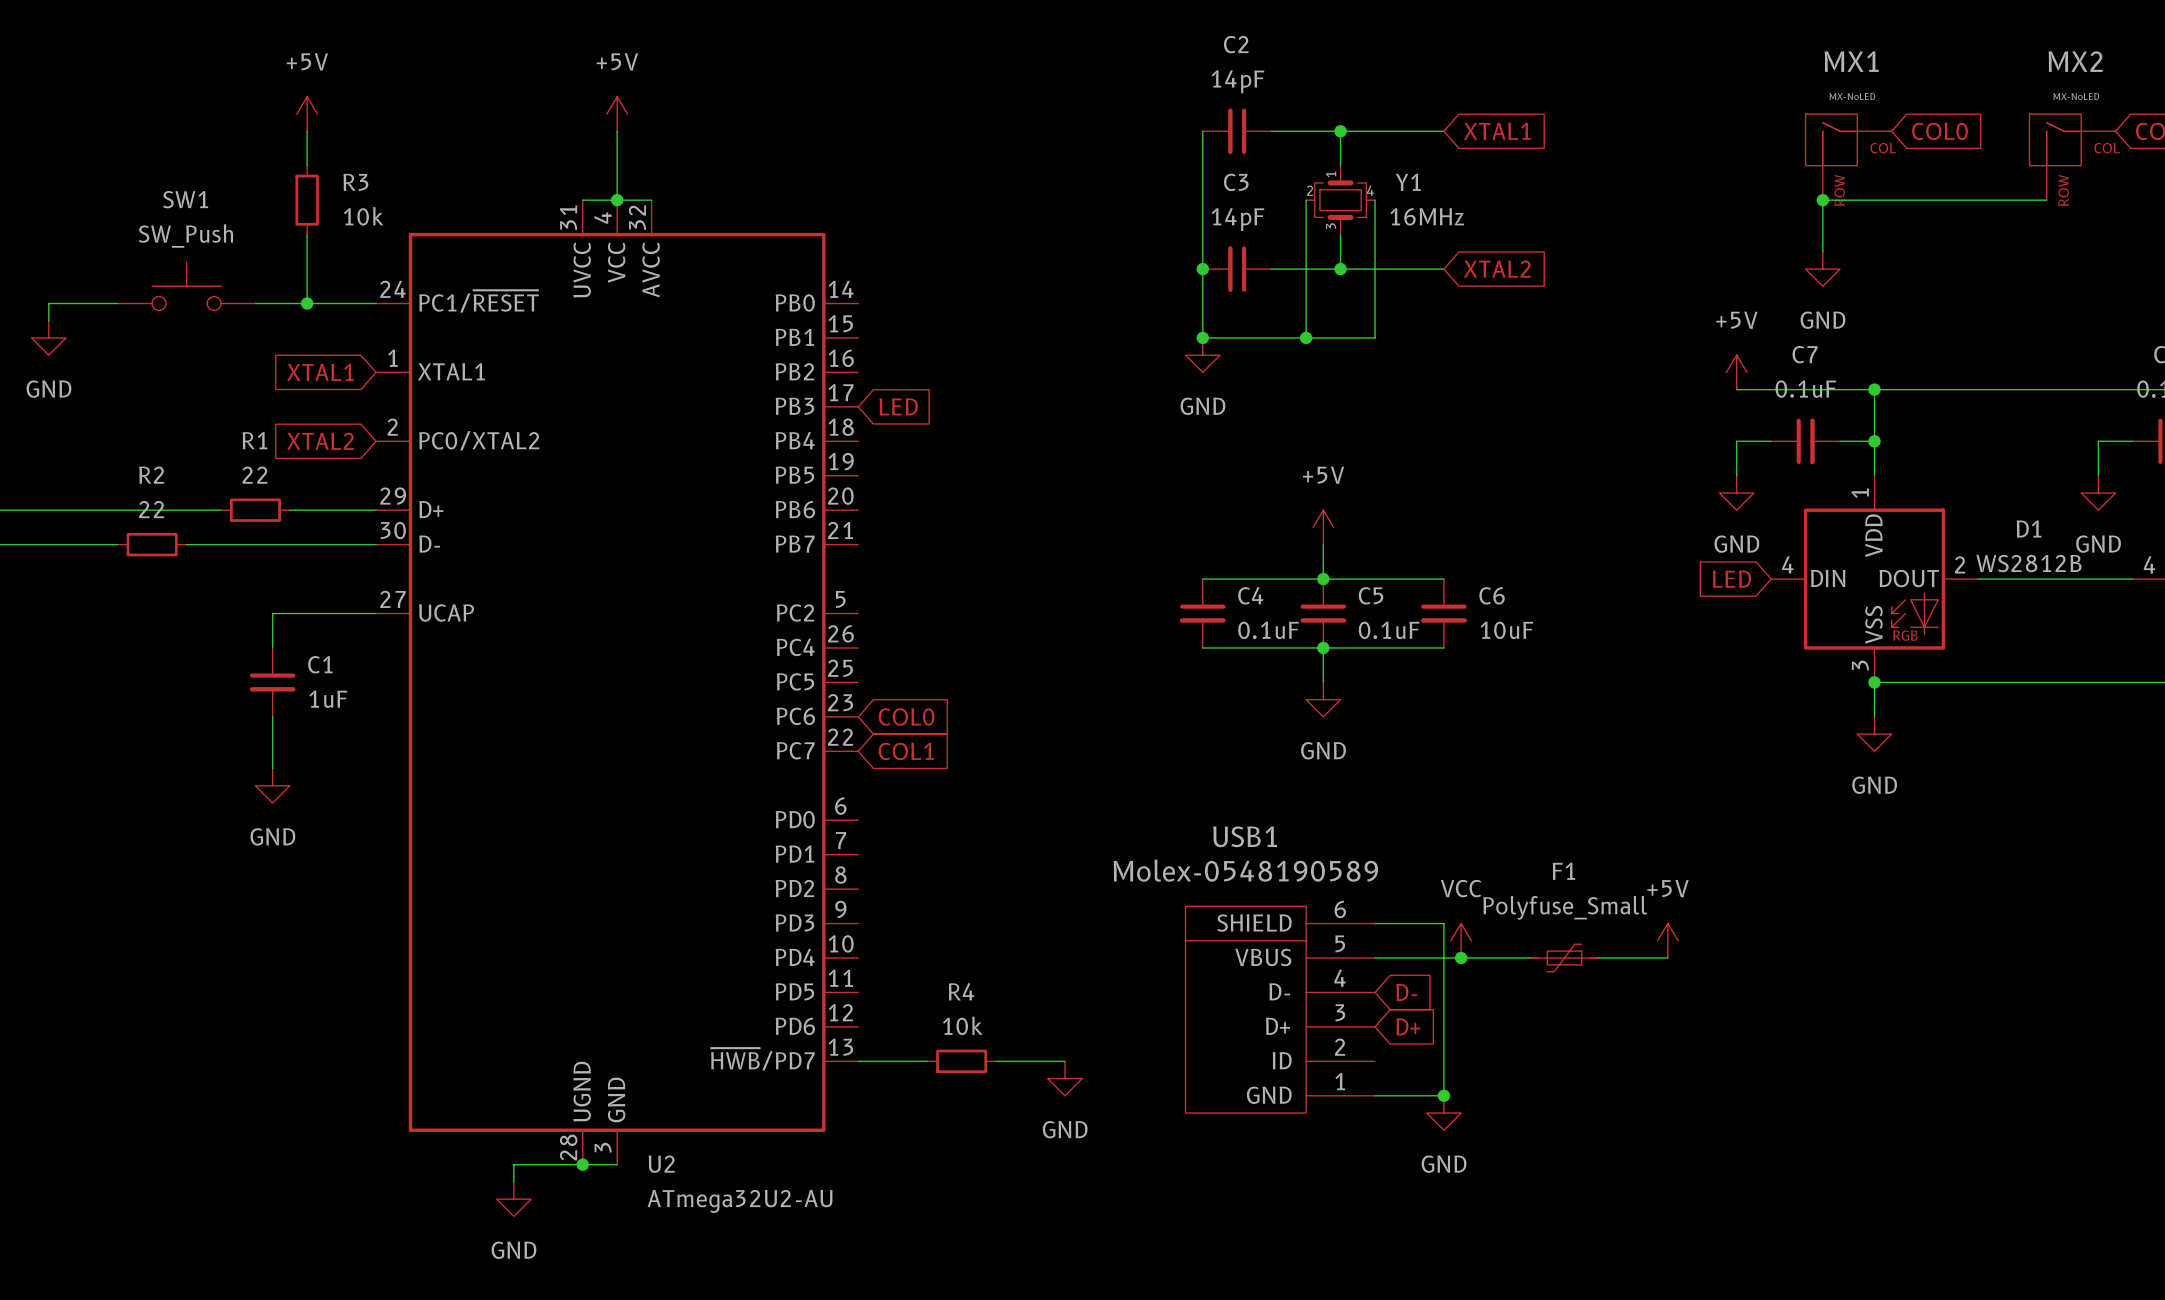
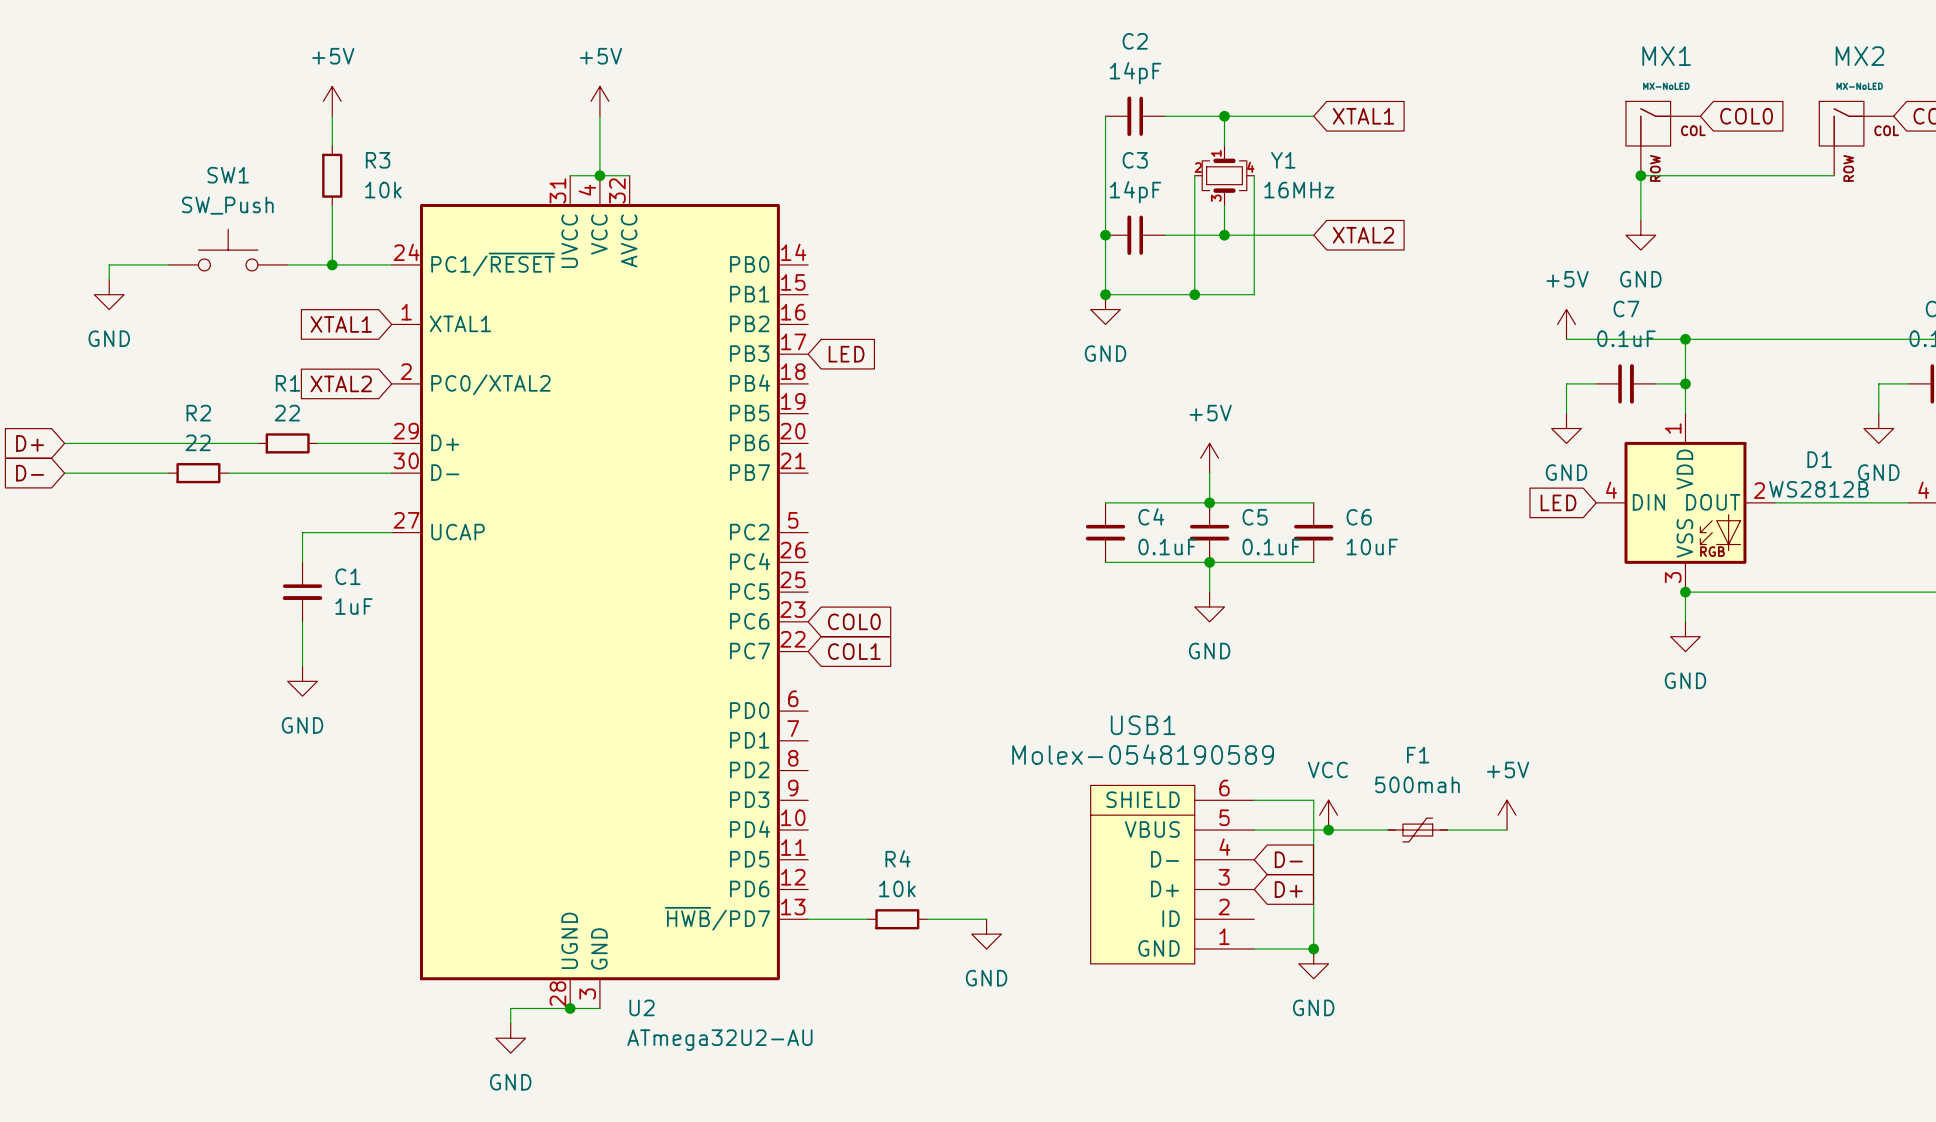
F1 value: Polyfuse_Small (1565, 907) -> 500mah (1417, 784)

